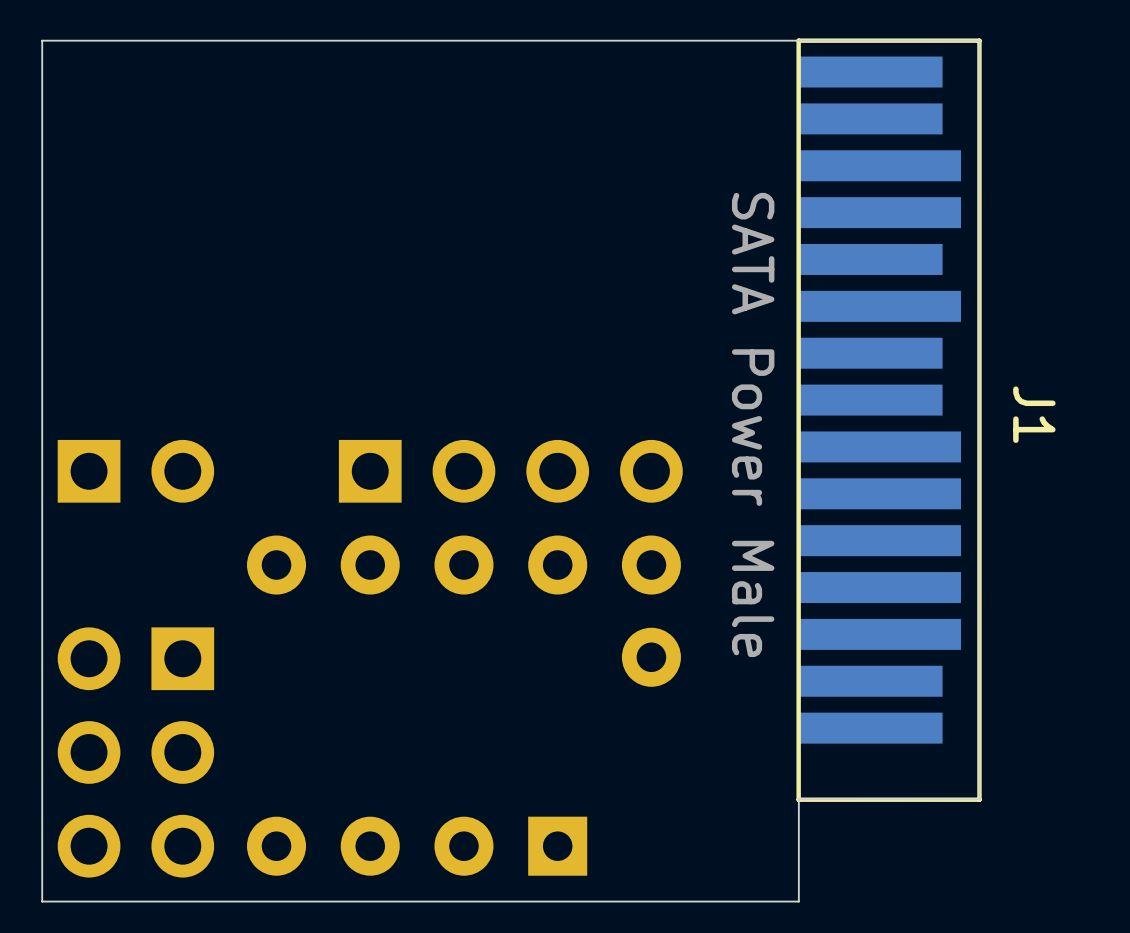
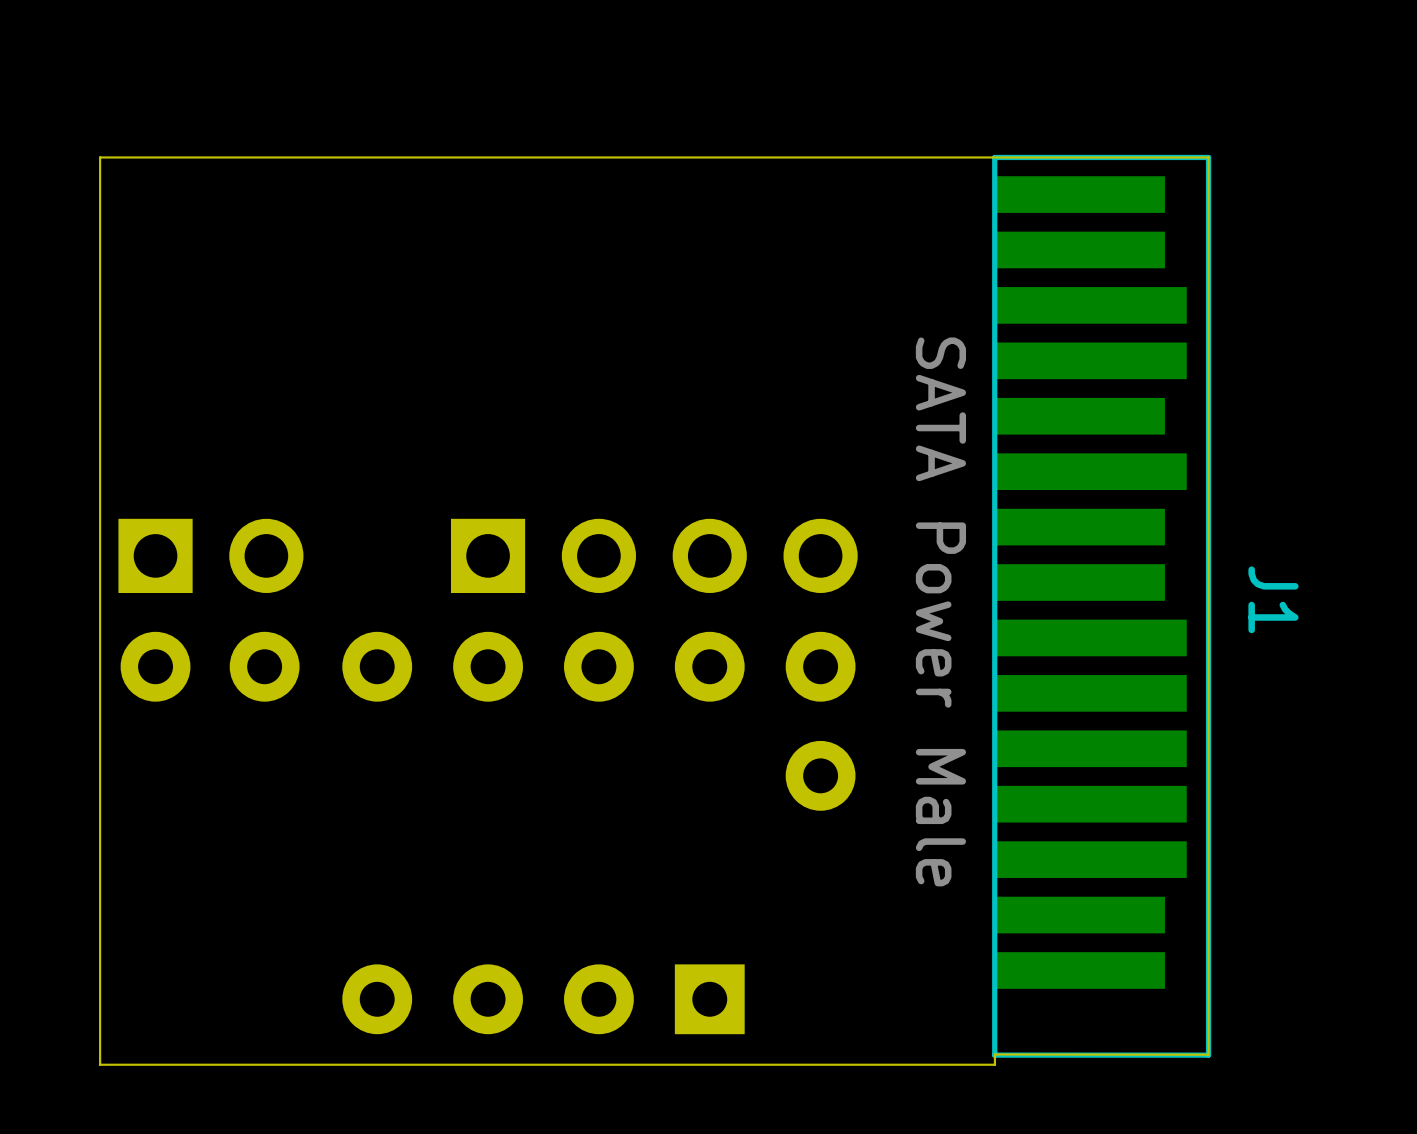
board edge: (979, 134) (979, 40) (42, 40) (42, 134) -> (1208, 157) (100, 157)
J1 position: (889, 420) -> (1101, 606)
part: none -> (210, 666)
part: (135, 752) -> none
board edge: (979, 799) (798, 799) (798, 892) -> (1208, 943) (1208, 1054) (994, 1054)

